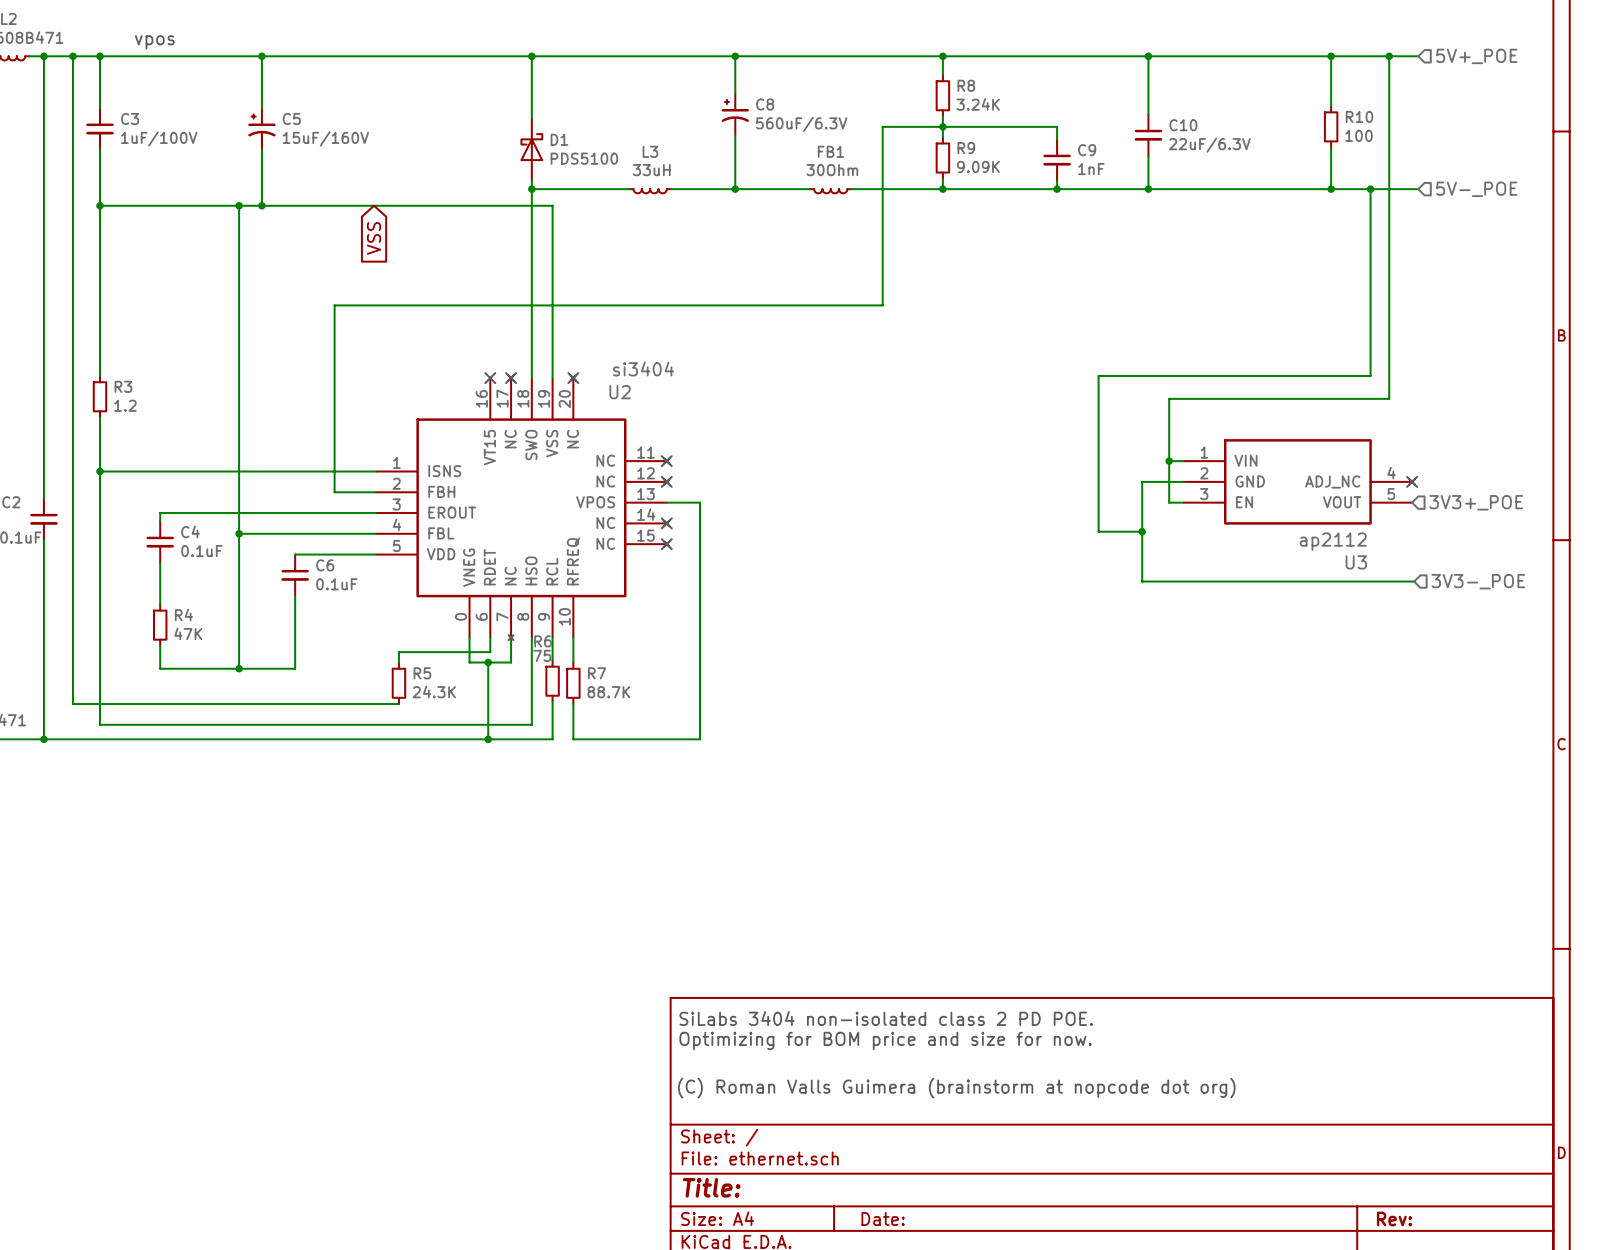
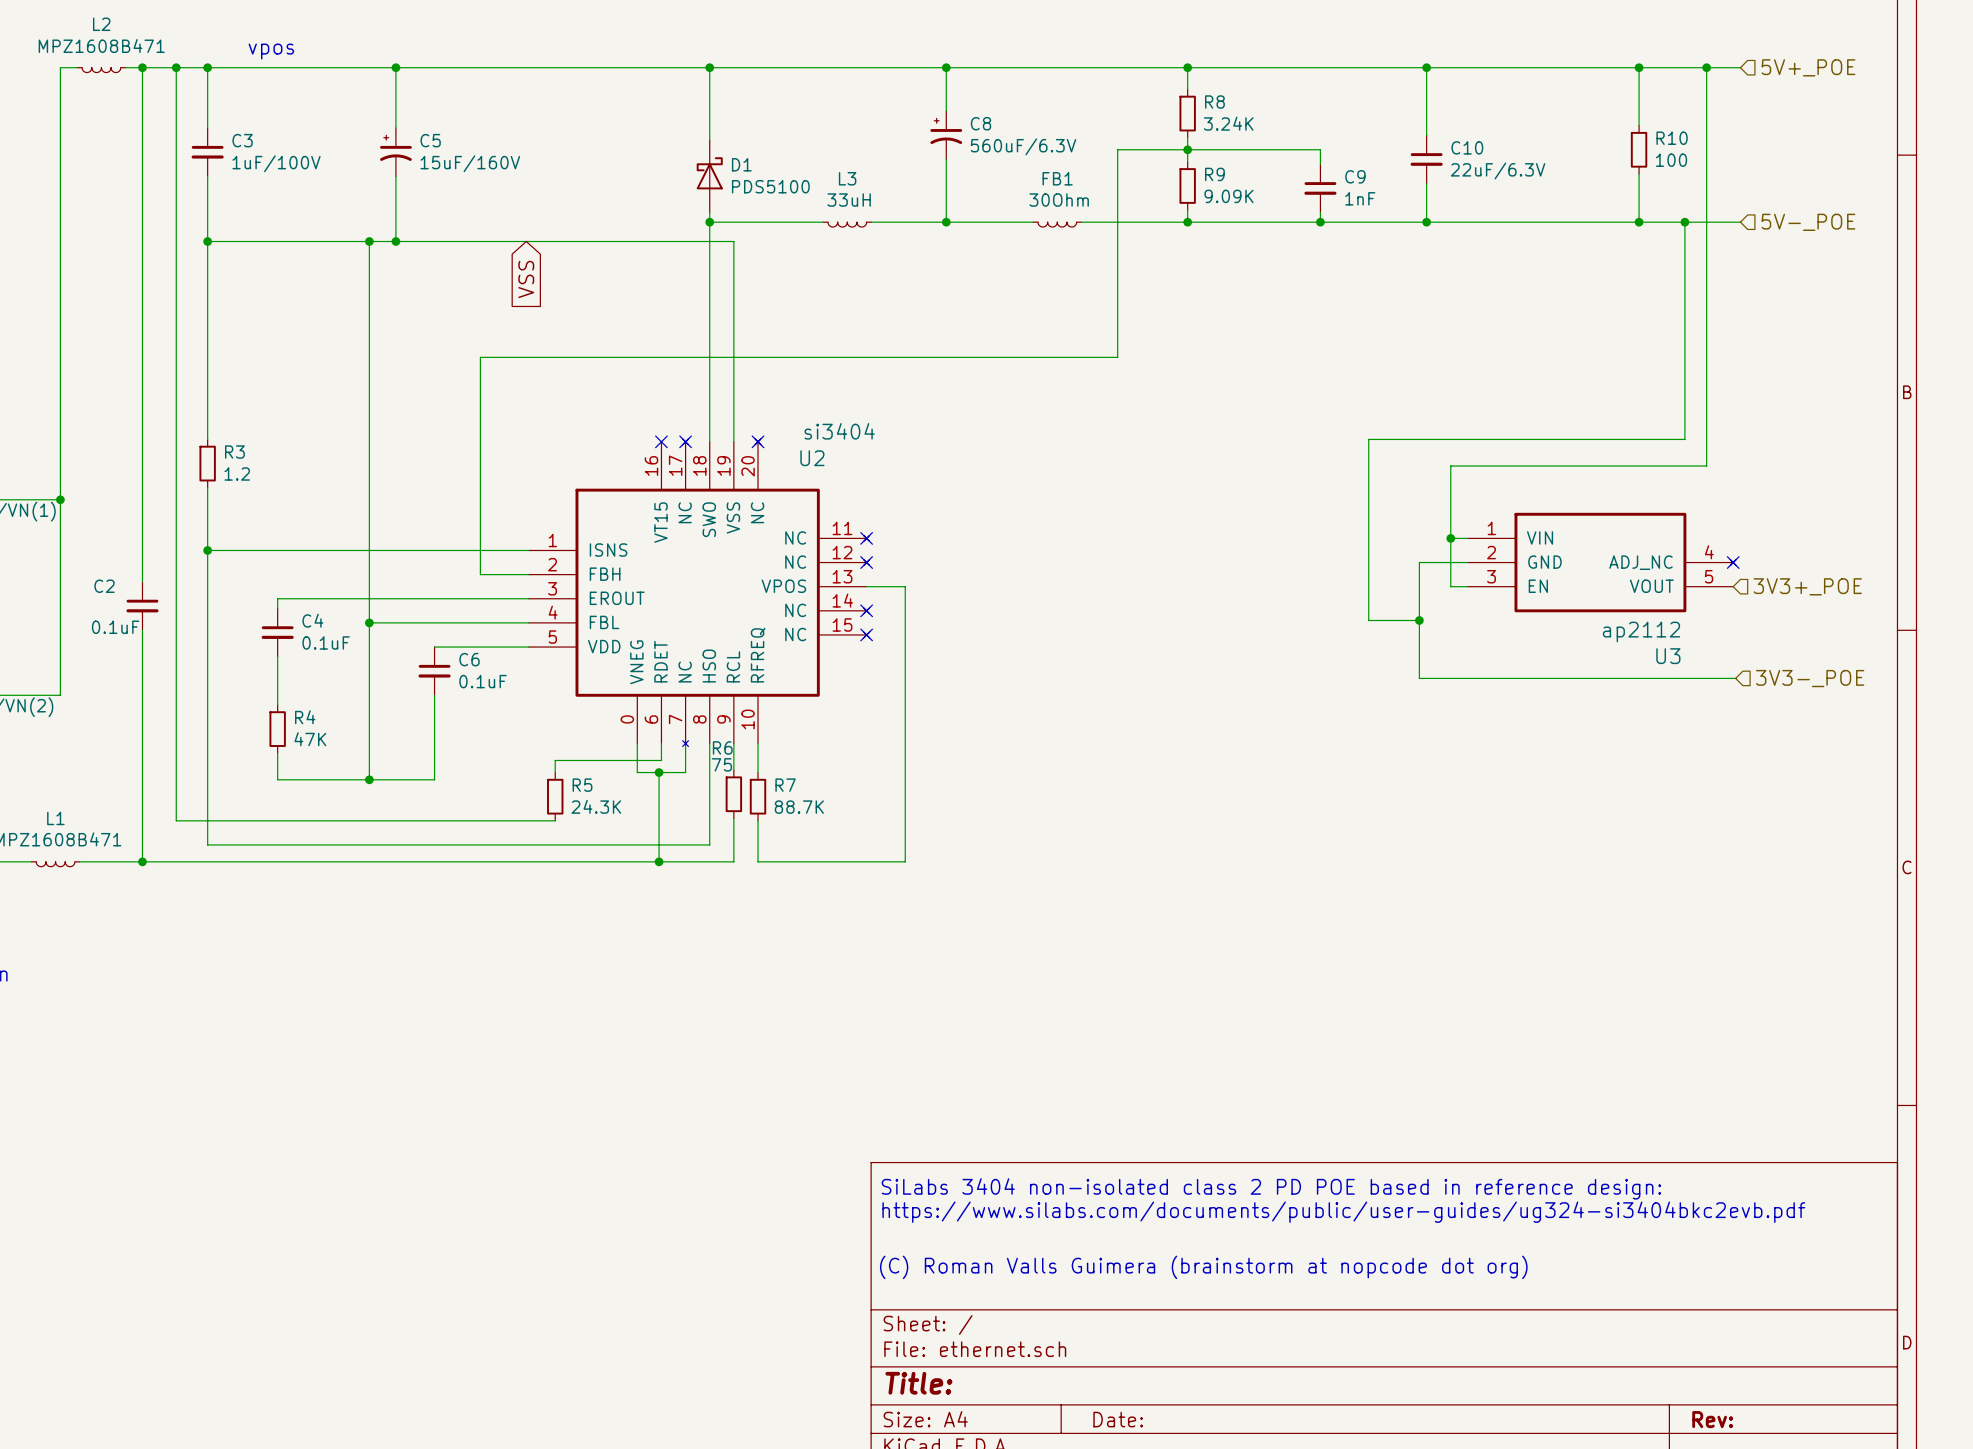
text: SiLabs 3404 non-isolated class 2 PD POE. (886, 1018) -> SiLabs 3404 non-isolated class 2 PD POE based in reference design: (1271, 1188)
text: Optimizing for BOM price and size for now. (885, 1040) -> https://www.silabs.com/documents/public/user-guides/ug324-si3404bkc2evb.pdf (1343, 1212)

